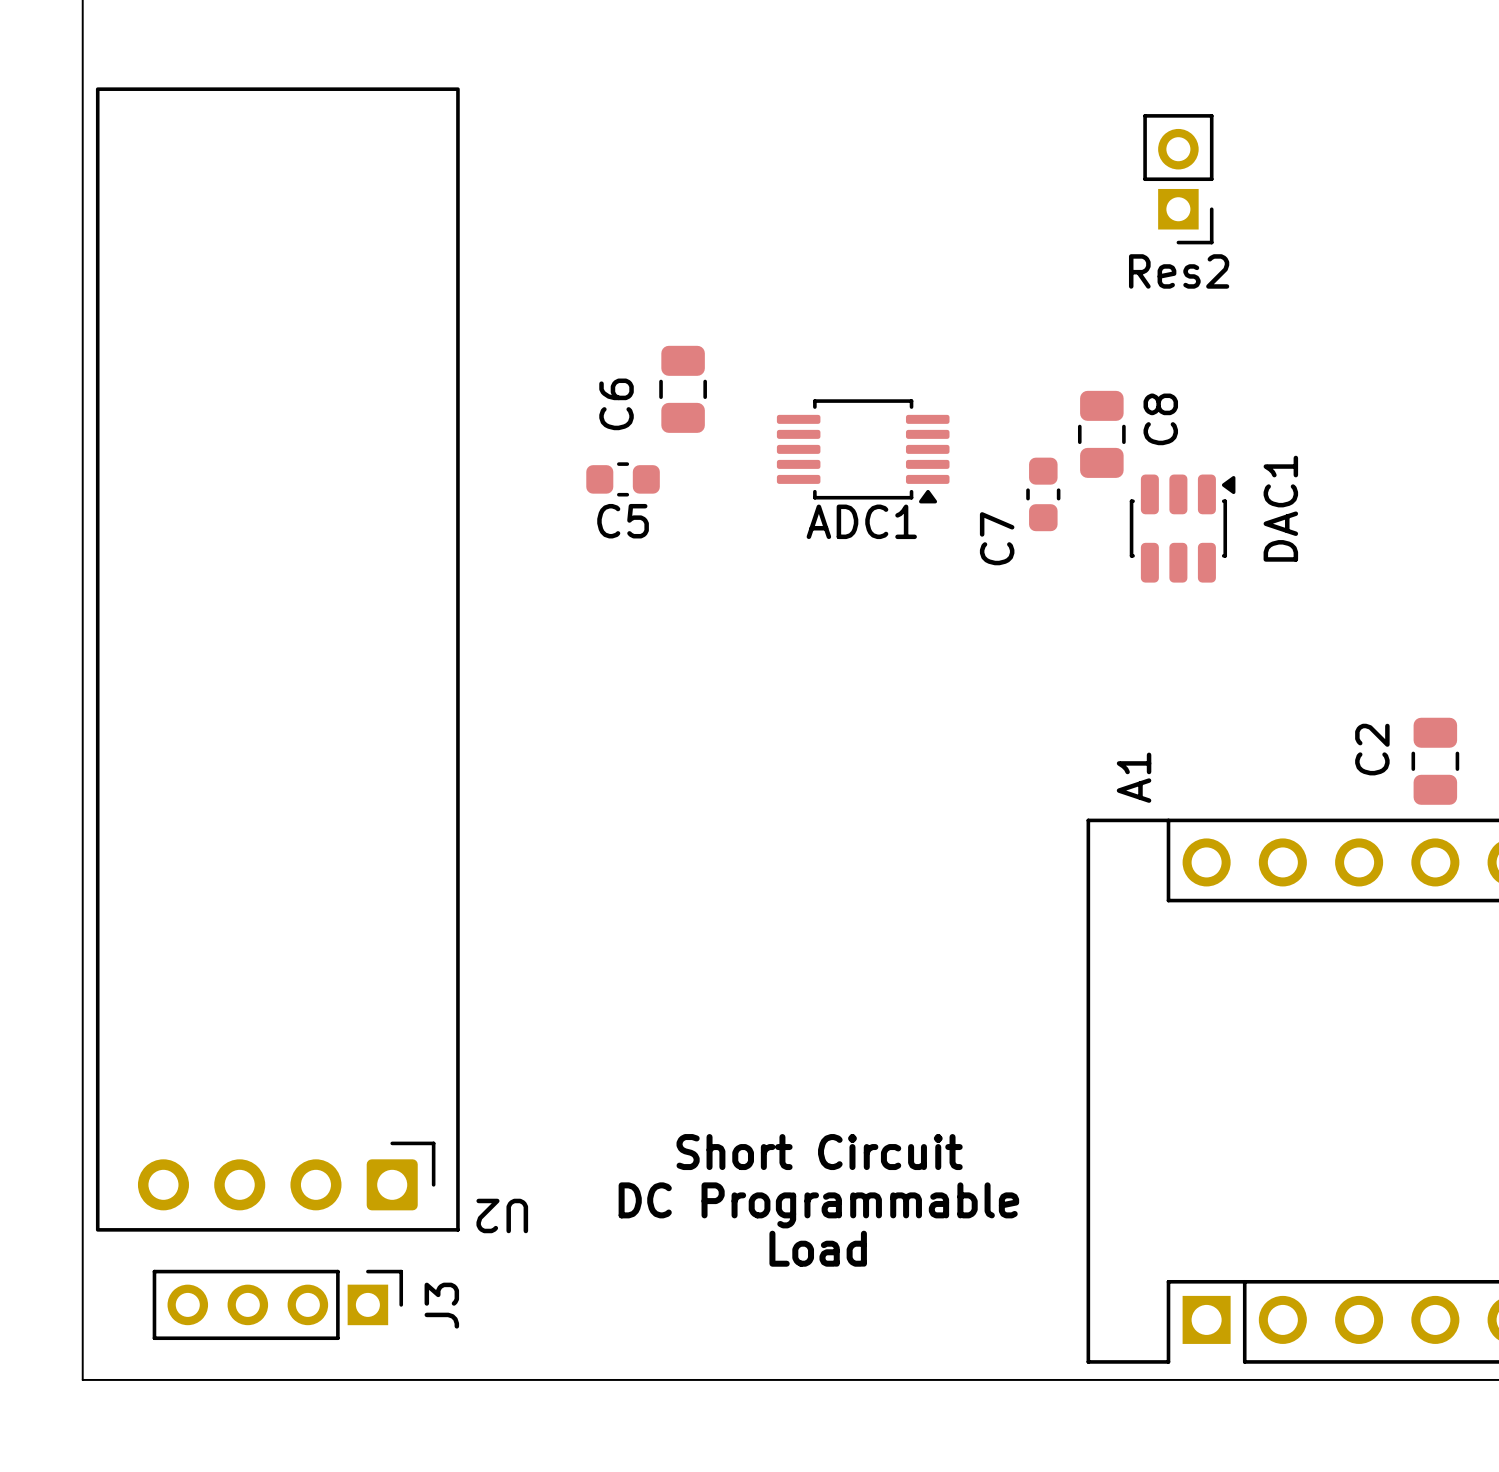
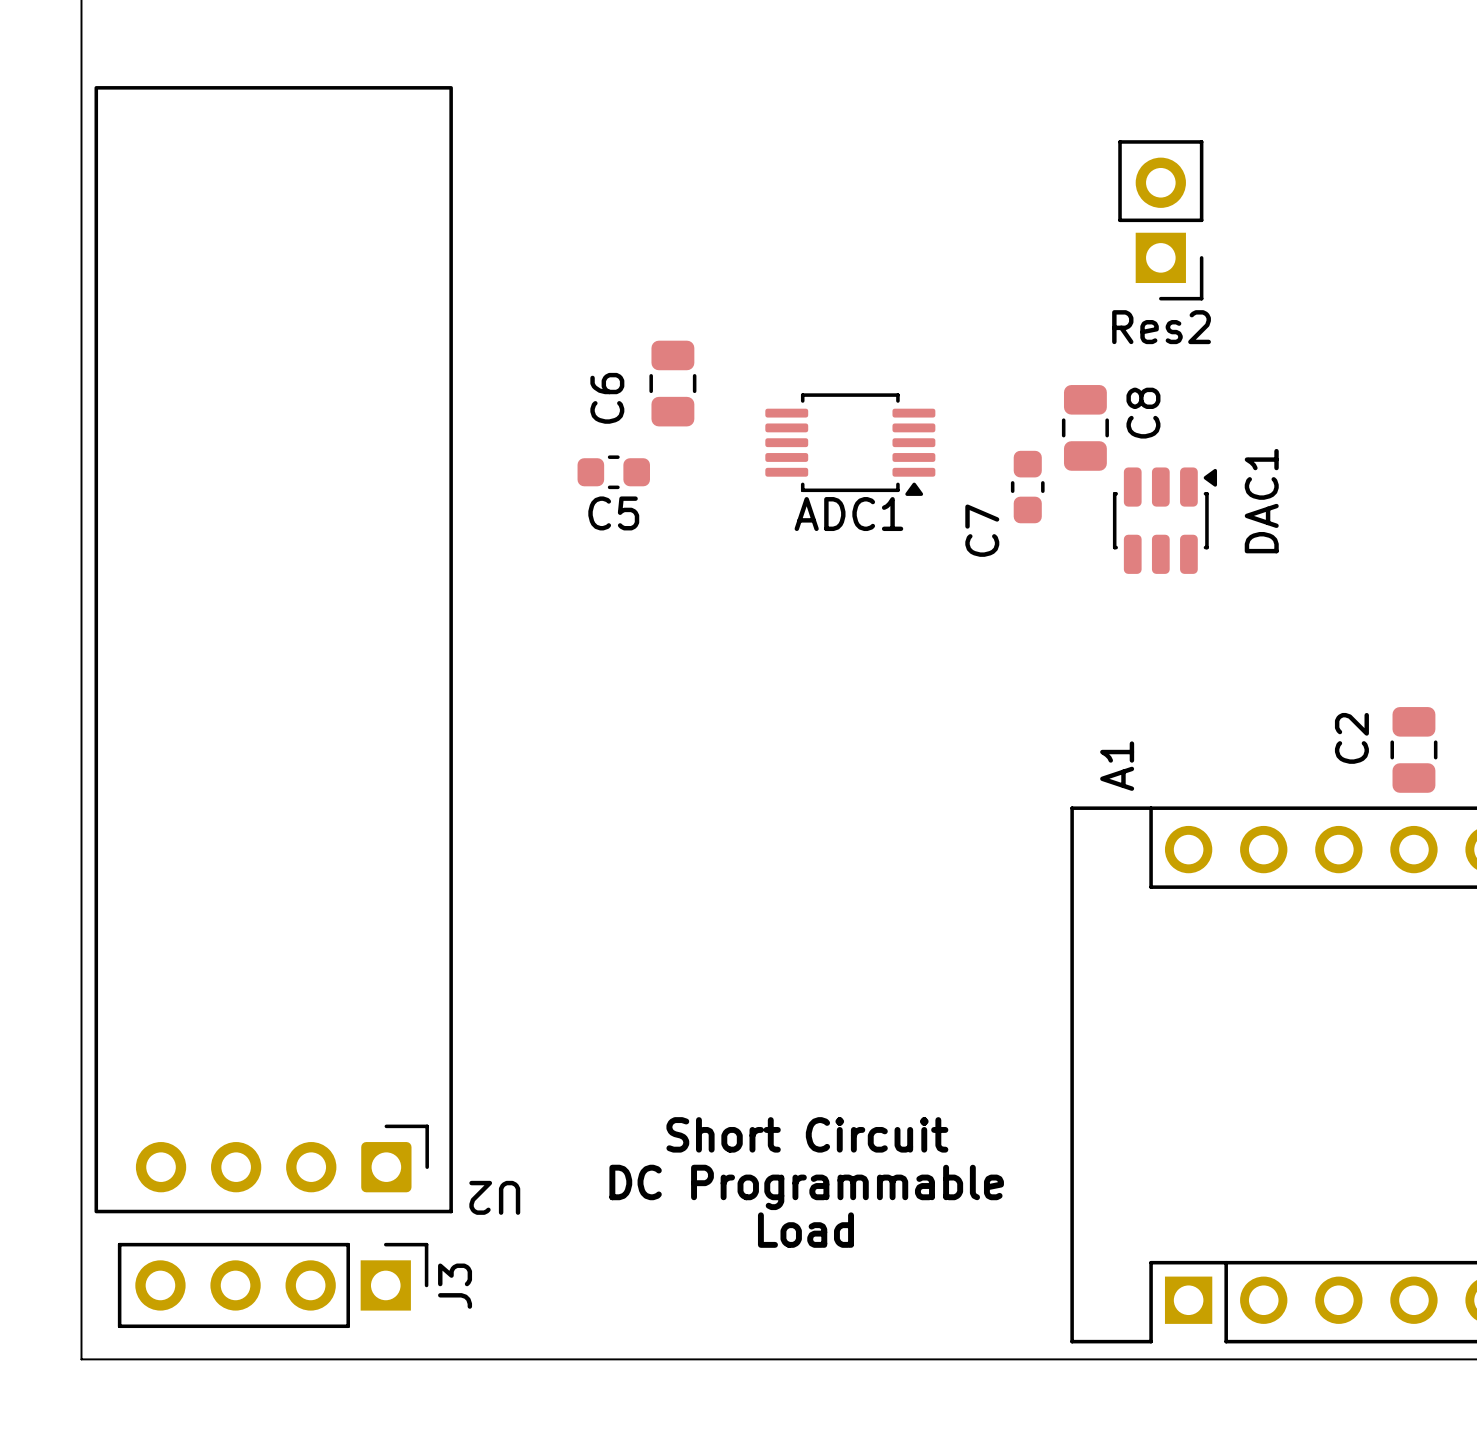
Res2 footprint: [1143, 114, 1214, 245] -> [1118, 140, 1204, 301]
J3 footprint: [152, 1269, 404, 1341] -> [117, 1242, 429, 1329]

